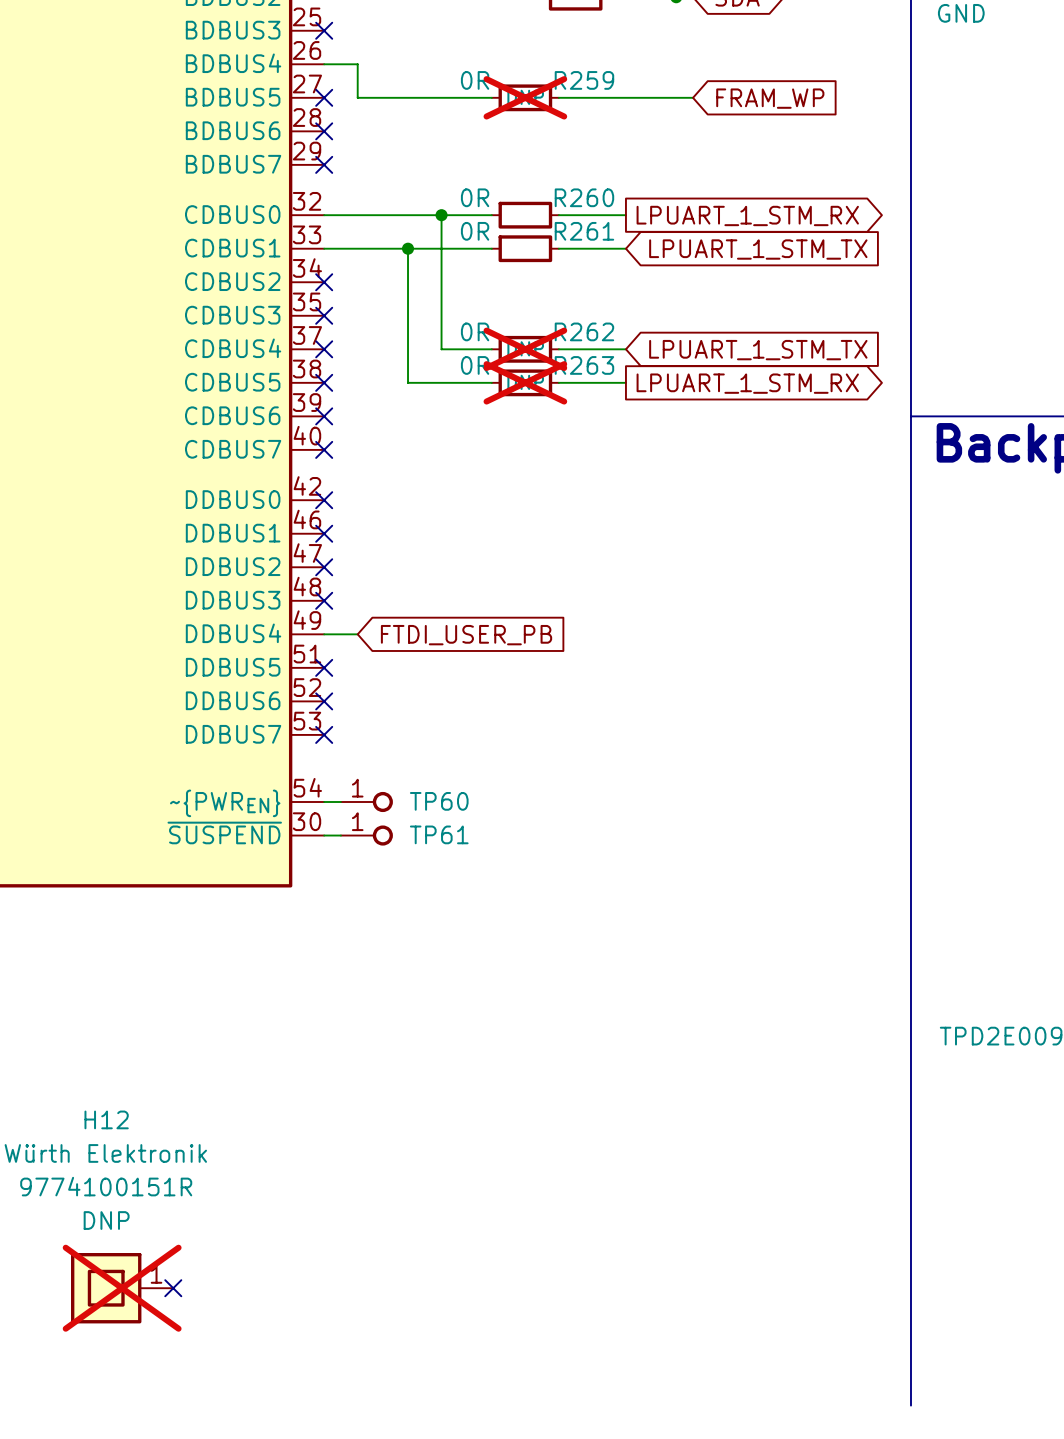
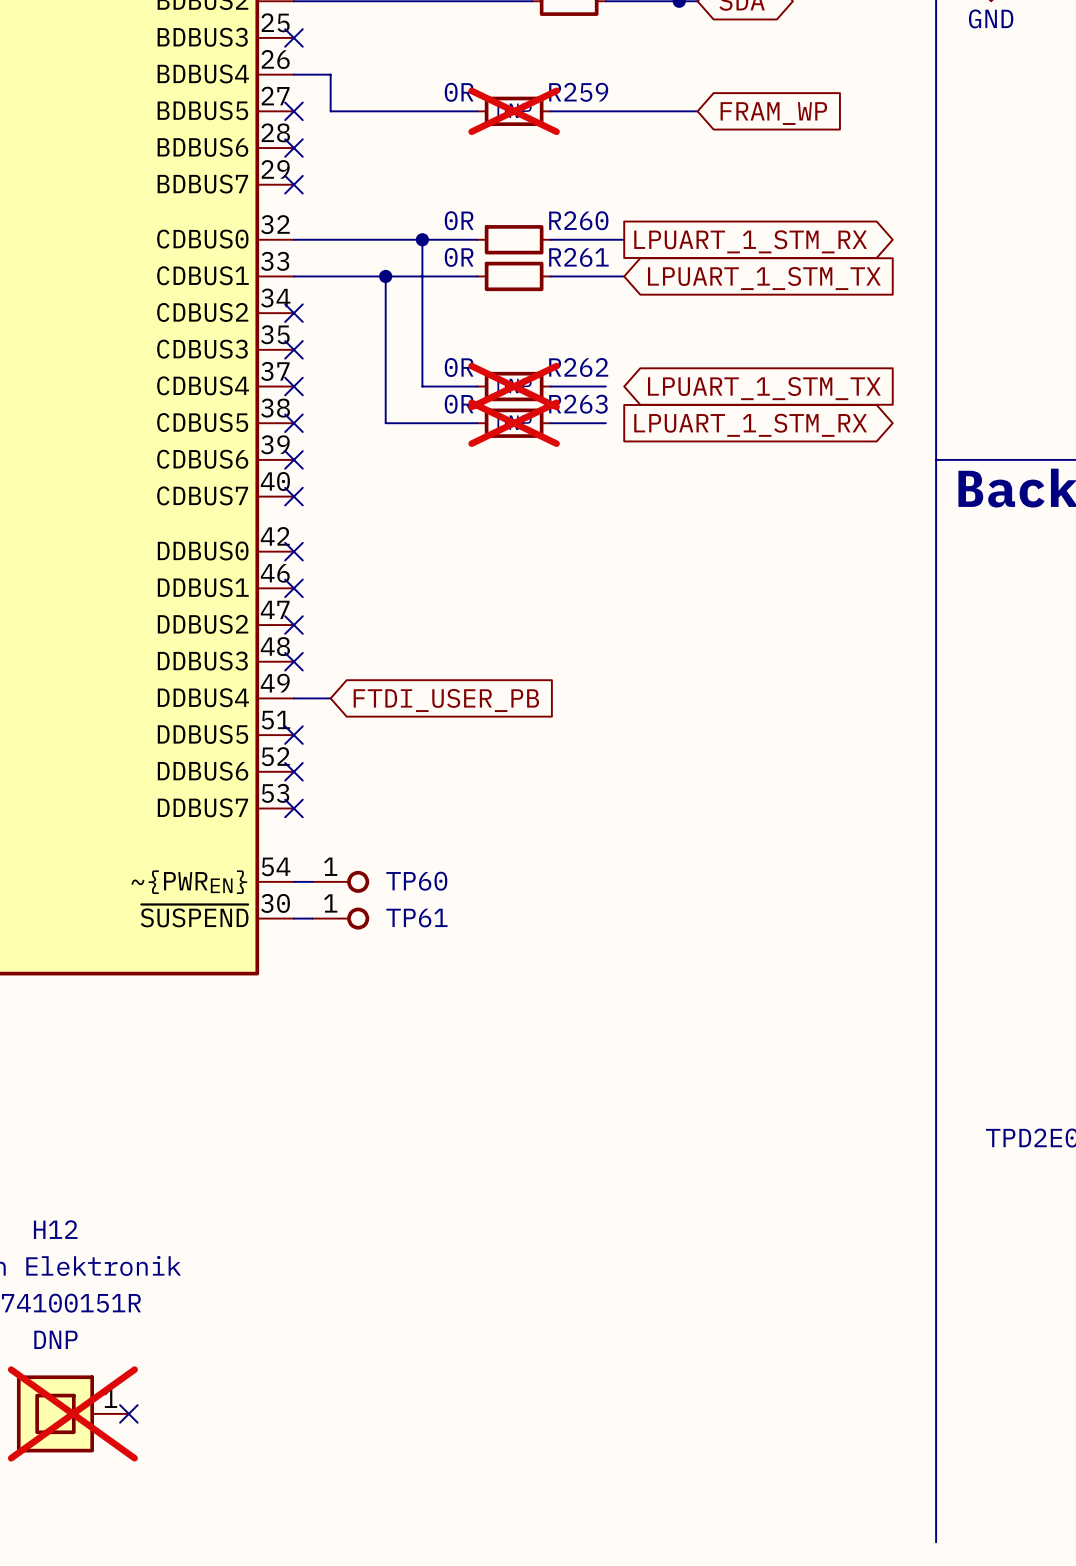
wire: (609, 349) (625, 349) -> none
wire: (609, 382) (625, 382) -> none

